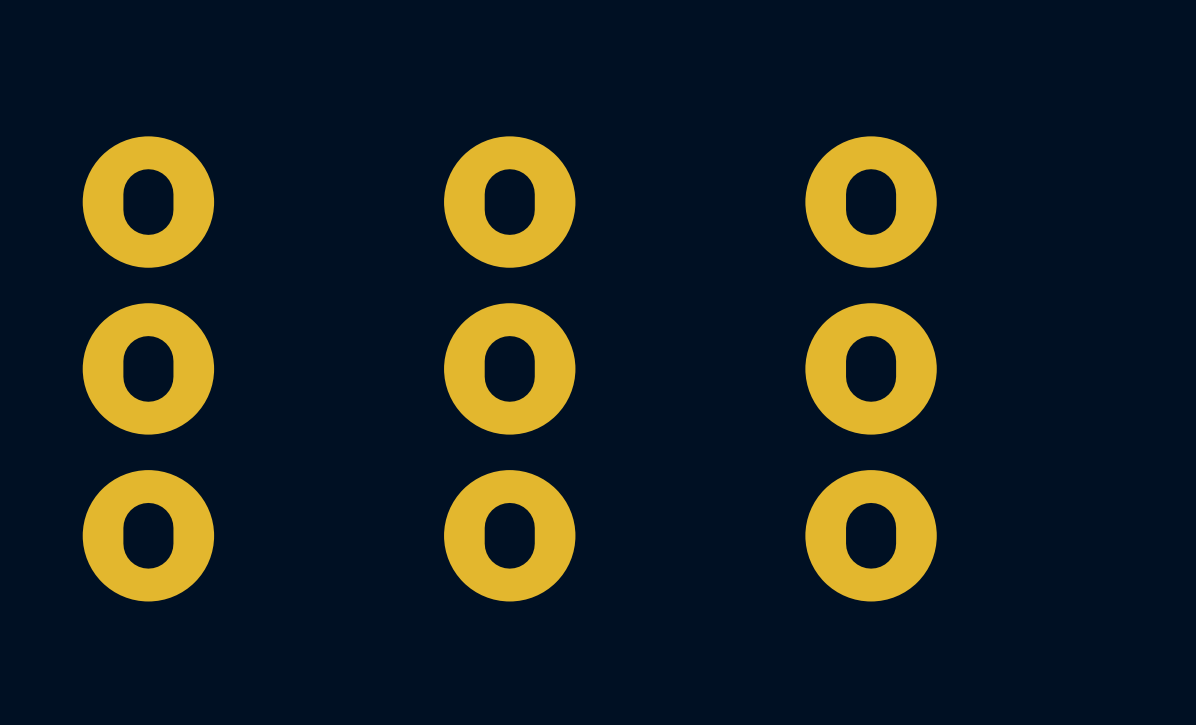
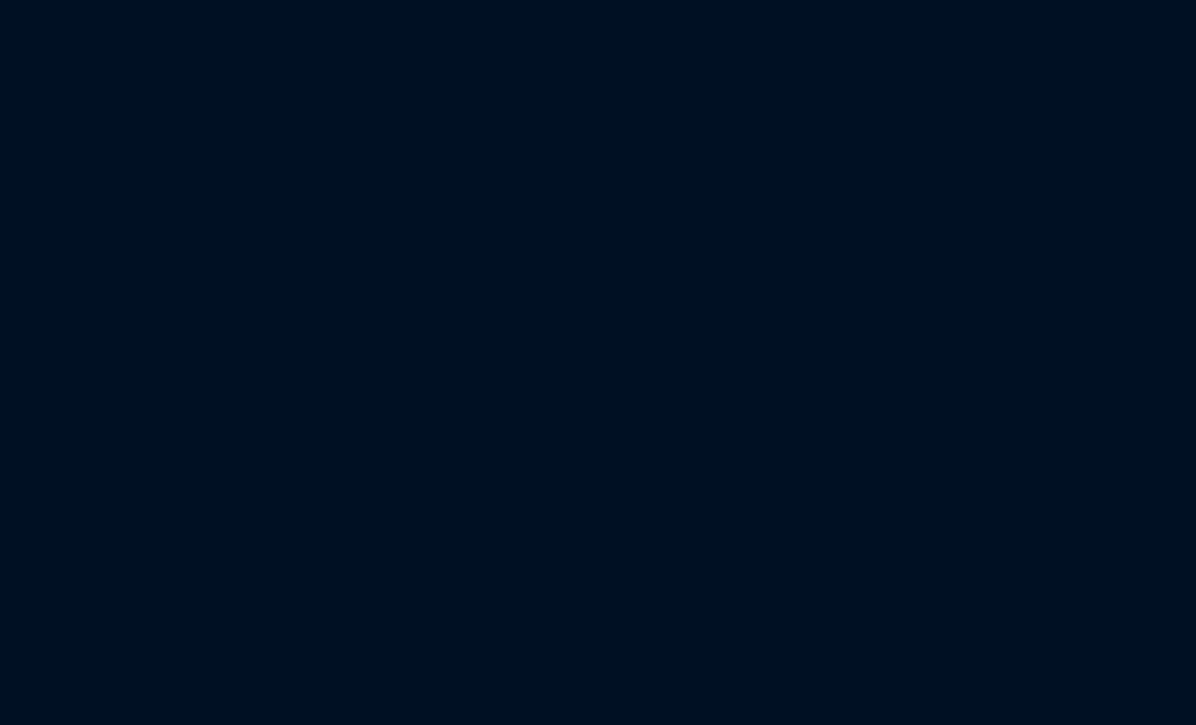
part: (148, 368) -> none
part: (509, 368) -> none
part: (871, 368) -> none

